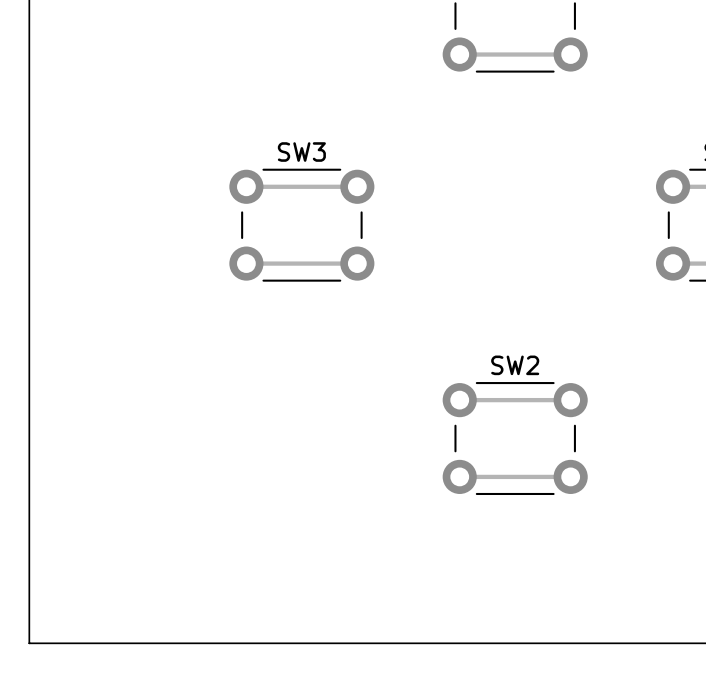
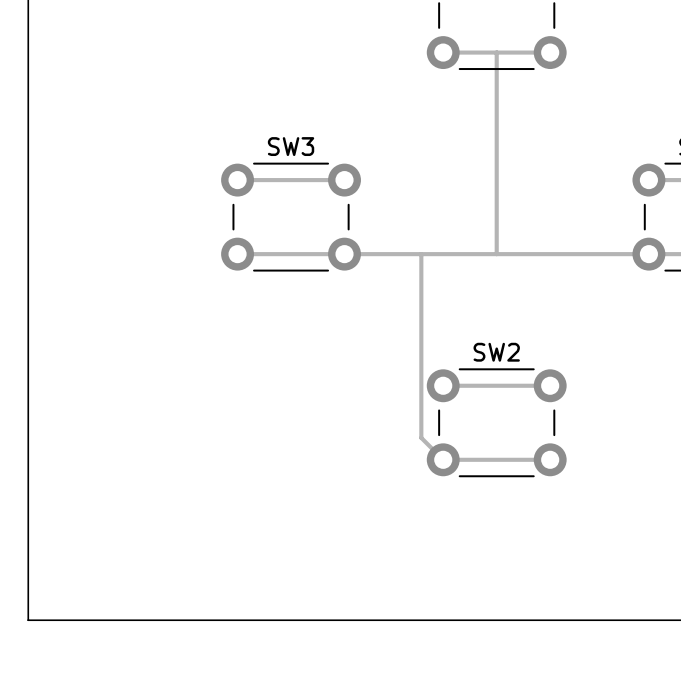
track: none -> (496, 52) (496, 254)
track: none -> (344, 254) (648, 254)
track: none -> (421, 254) (421, 437) (443, 459)

